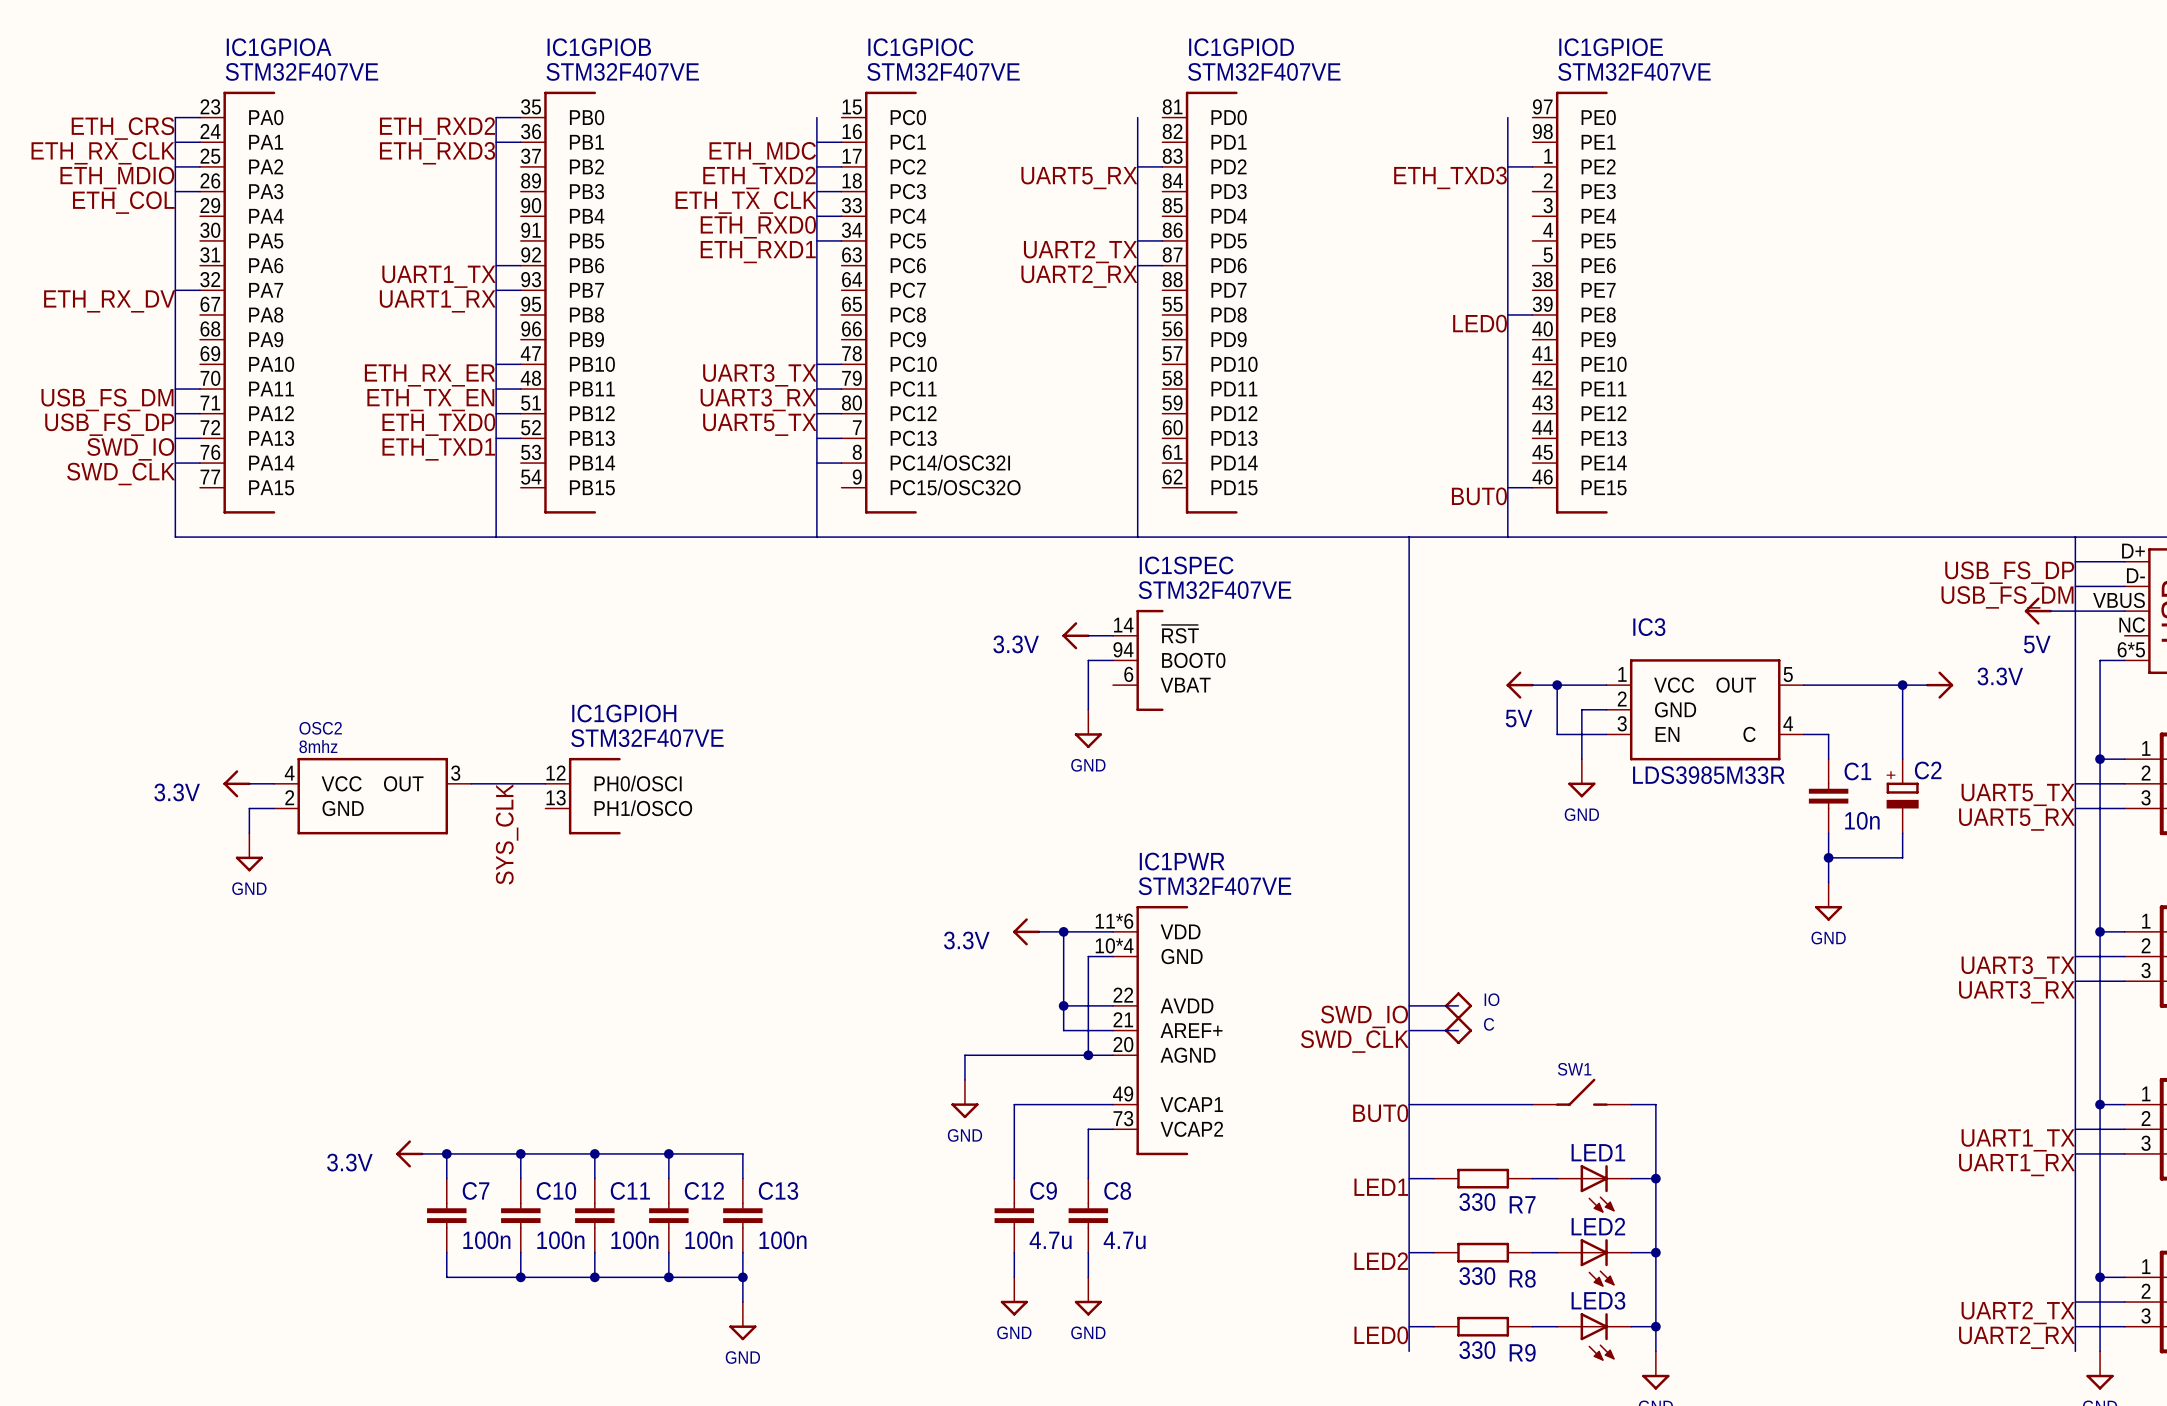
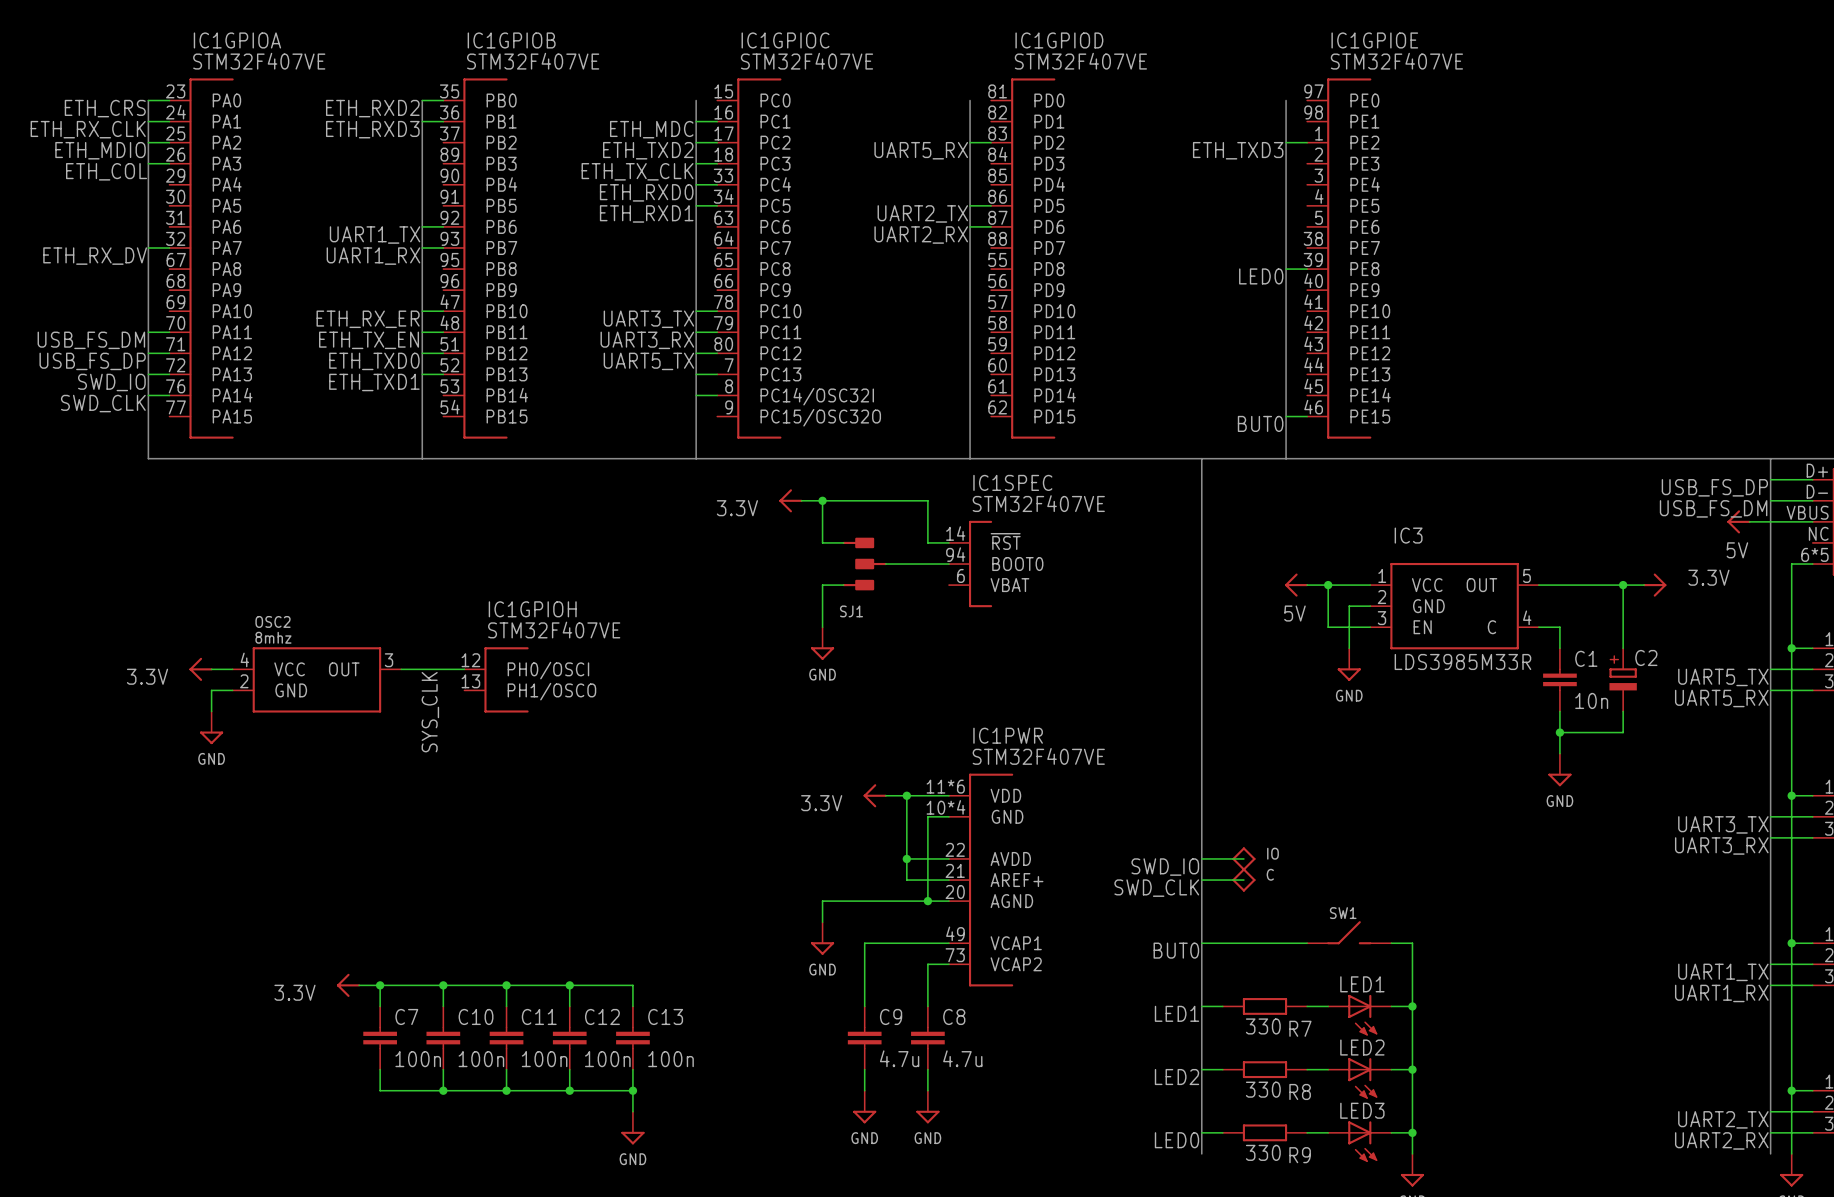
wire: none -> (801, 500) (927, 500) (927, 542)
wire: none -> (822, 500) (822, 542) (843, 542)
junction: none -> (822, 500)
power symbol position: 3.3V (1076, 635) -> 3.3V (790, 500)
SJ1: none -> (864, 564)
wire: (1088, 660) (1088, 709) -> (927, 564) (885, 564)
wire: none -> (843, 585) (822, 585) (822, 627)
power symbol position: GND (1088, 728) -> GND (822, 643)

